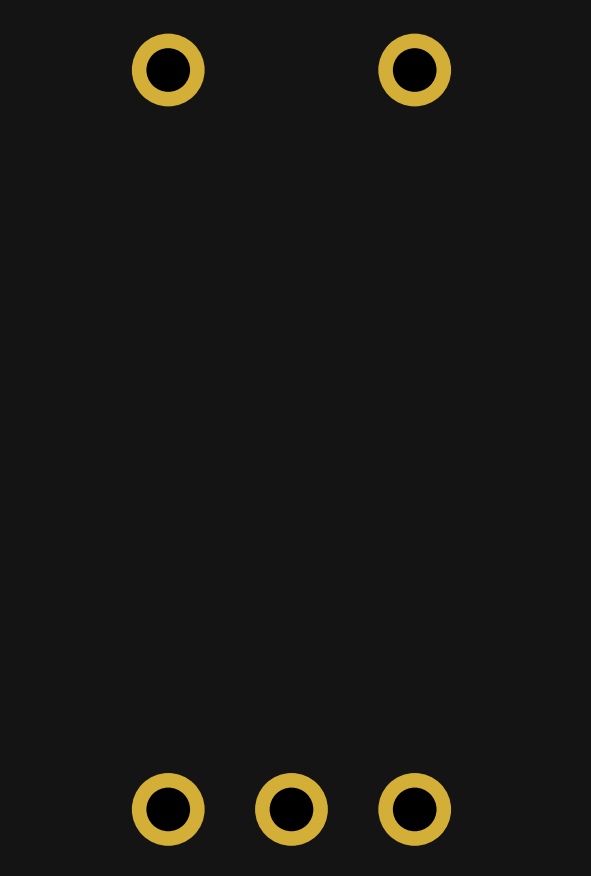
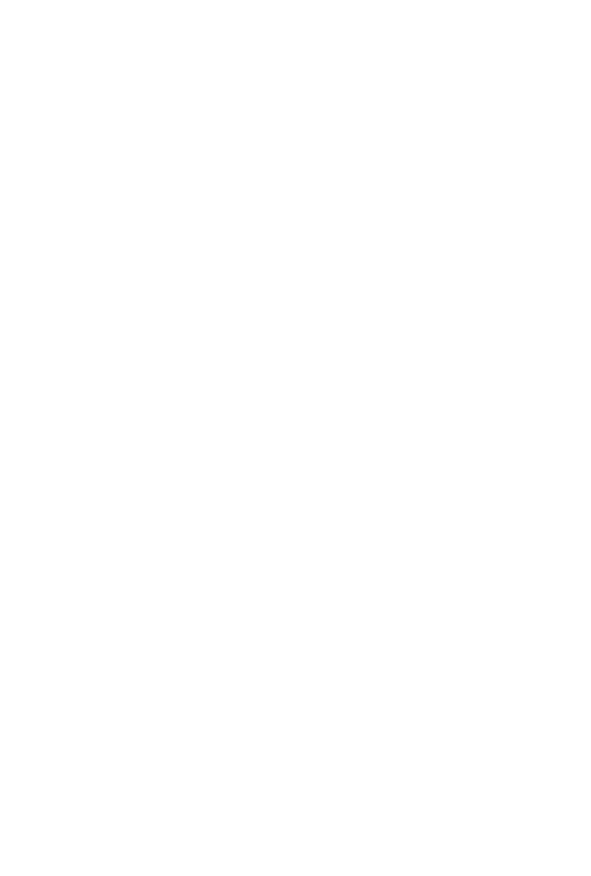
part: (168, 70) -> none
part: (414, 70) -> none
part: (291, 809) -> none

